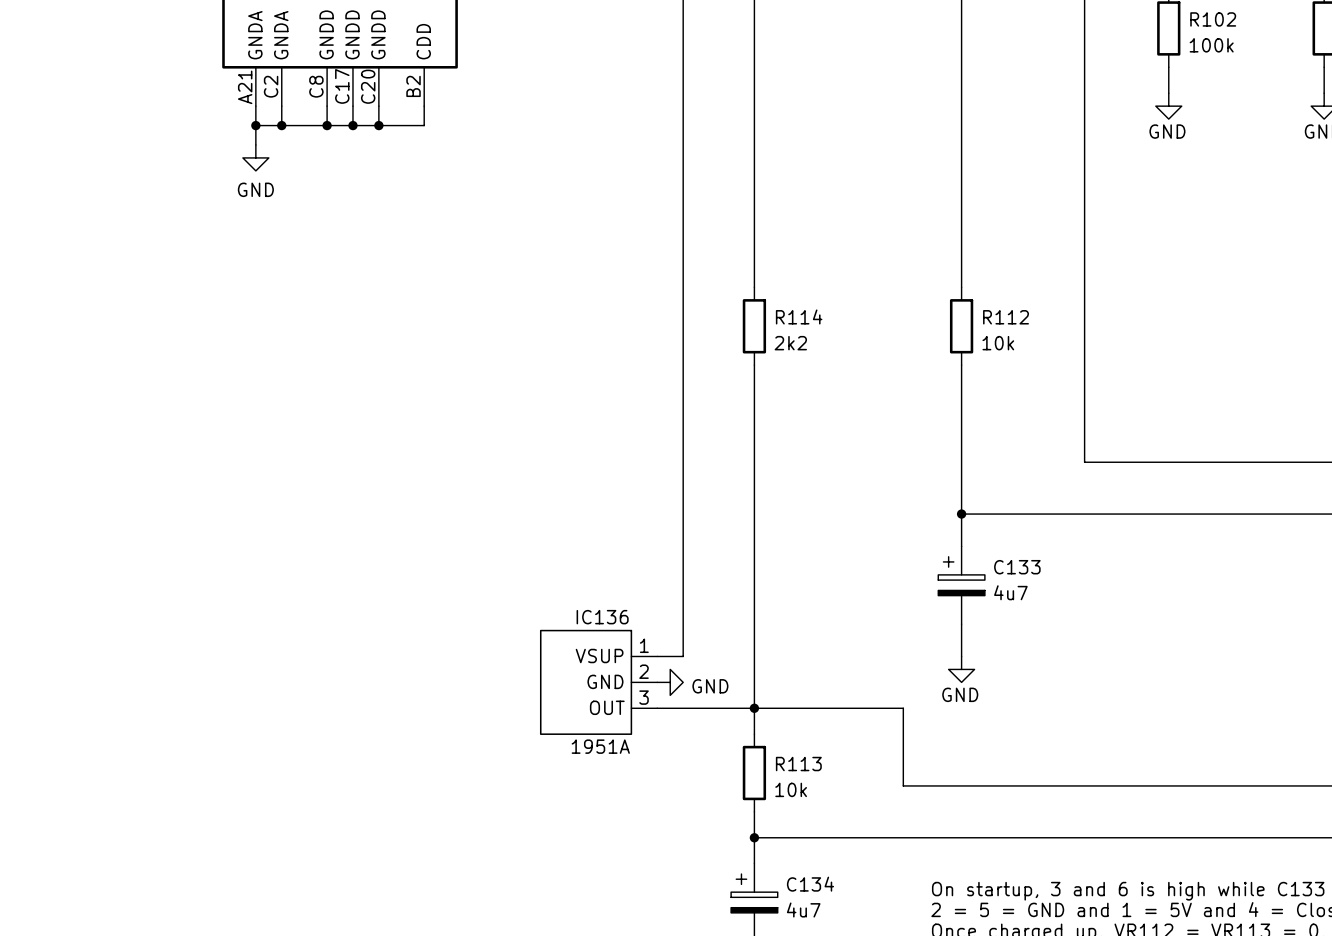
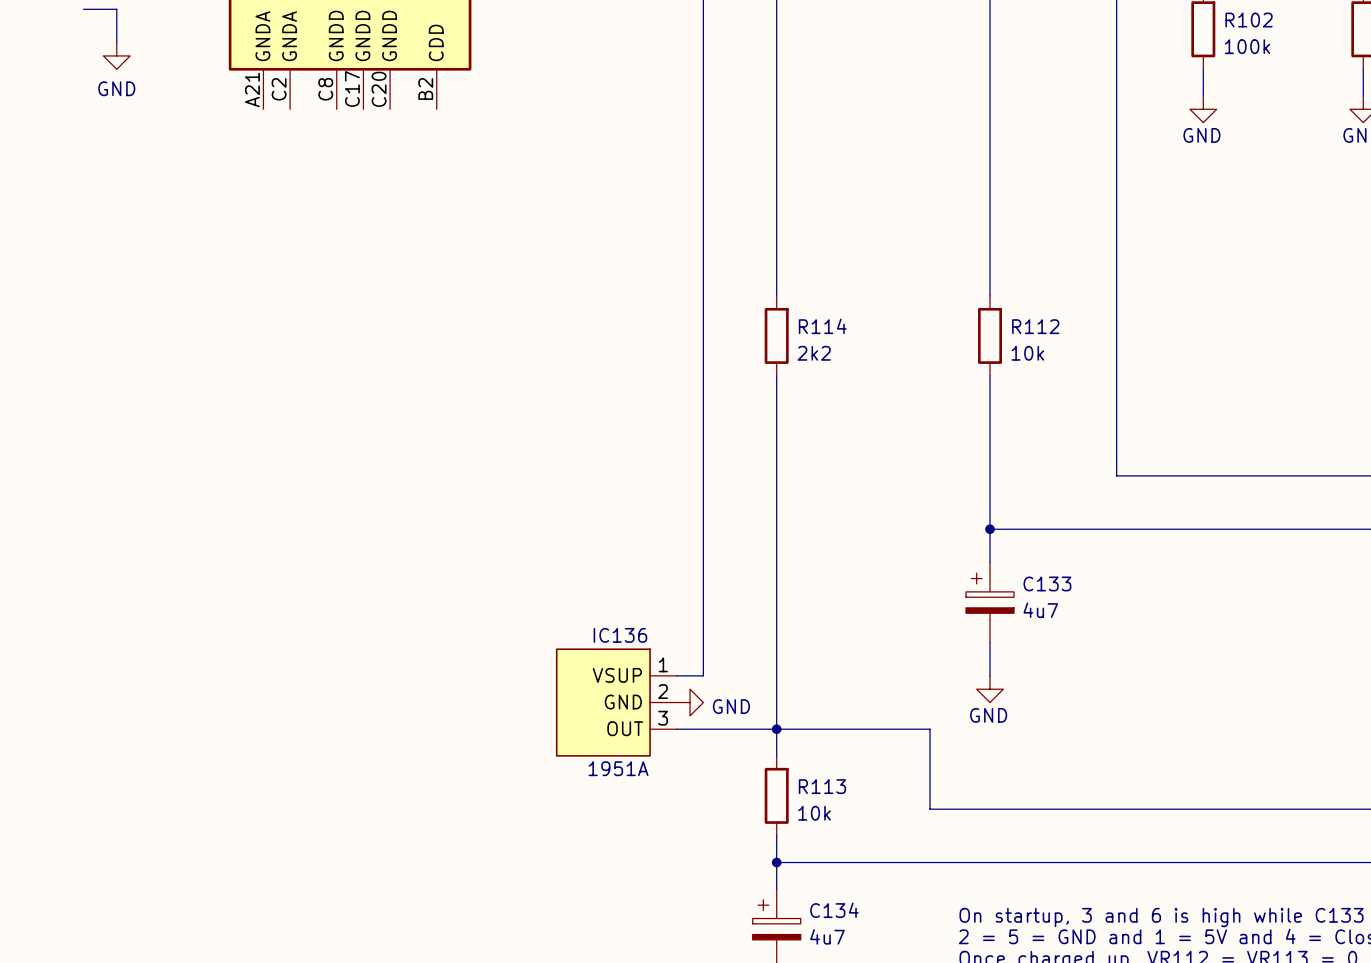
wire: none -> (83, 9) (116, 9) (116, 42)
power symbol: none -> GND (116, 55)
wire: (255, 106) (255, 144) -> none
wire: (281, 106) (281, 125) -> none
wire: (327, 106) (327, 125) -> none
wire: (352, 106) (352, 125) -> none
wire: (378, 106) (378, 125) -> none
wire: (424, 106) (424, 125) (255, 125) -> none
junction: (255, 125) -> none
junction: (281, 125) -> none
junction: (327, 125) -> none
junction: (352, 125) -> none
junction: (378, 125) -> none
power symbol: GND (255, 157) -> none

